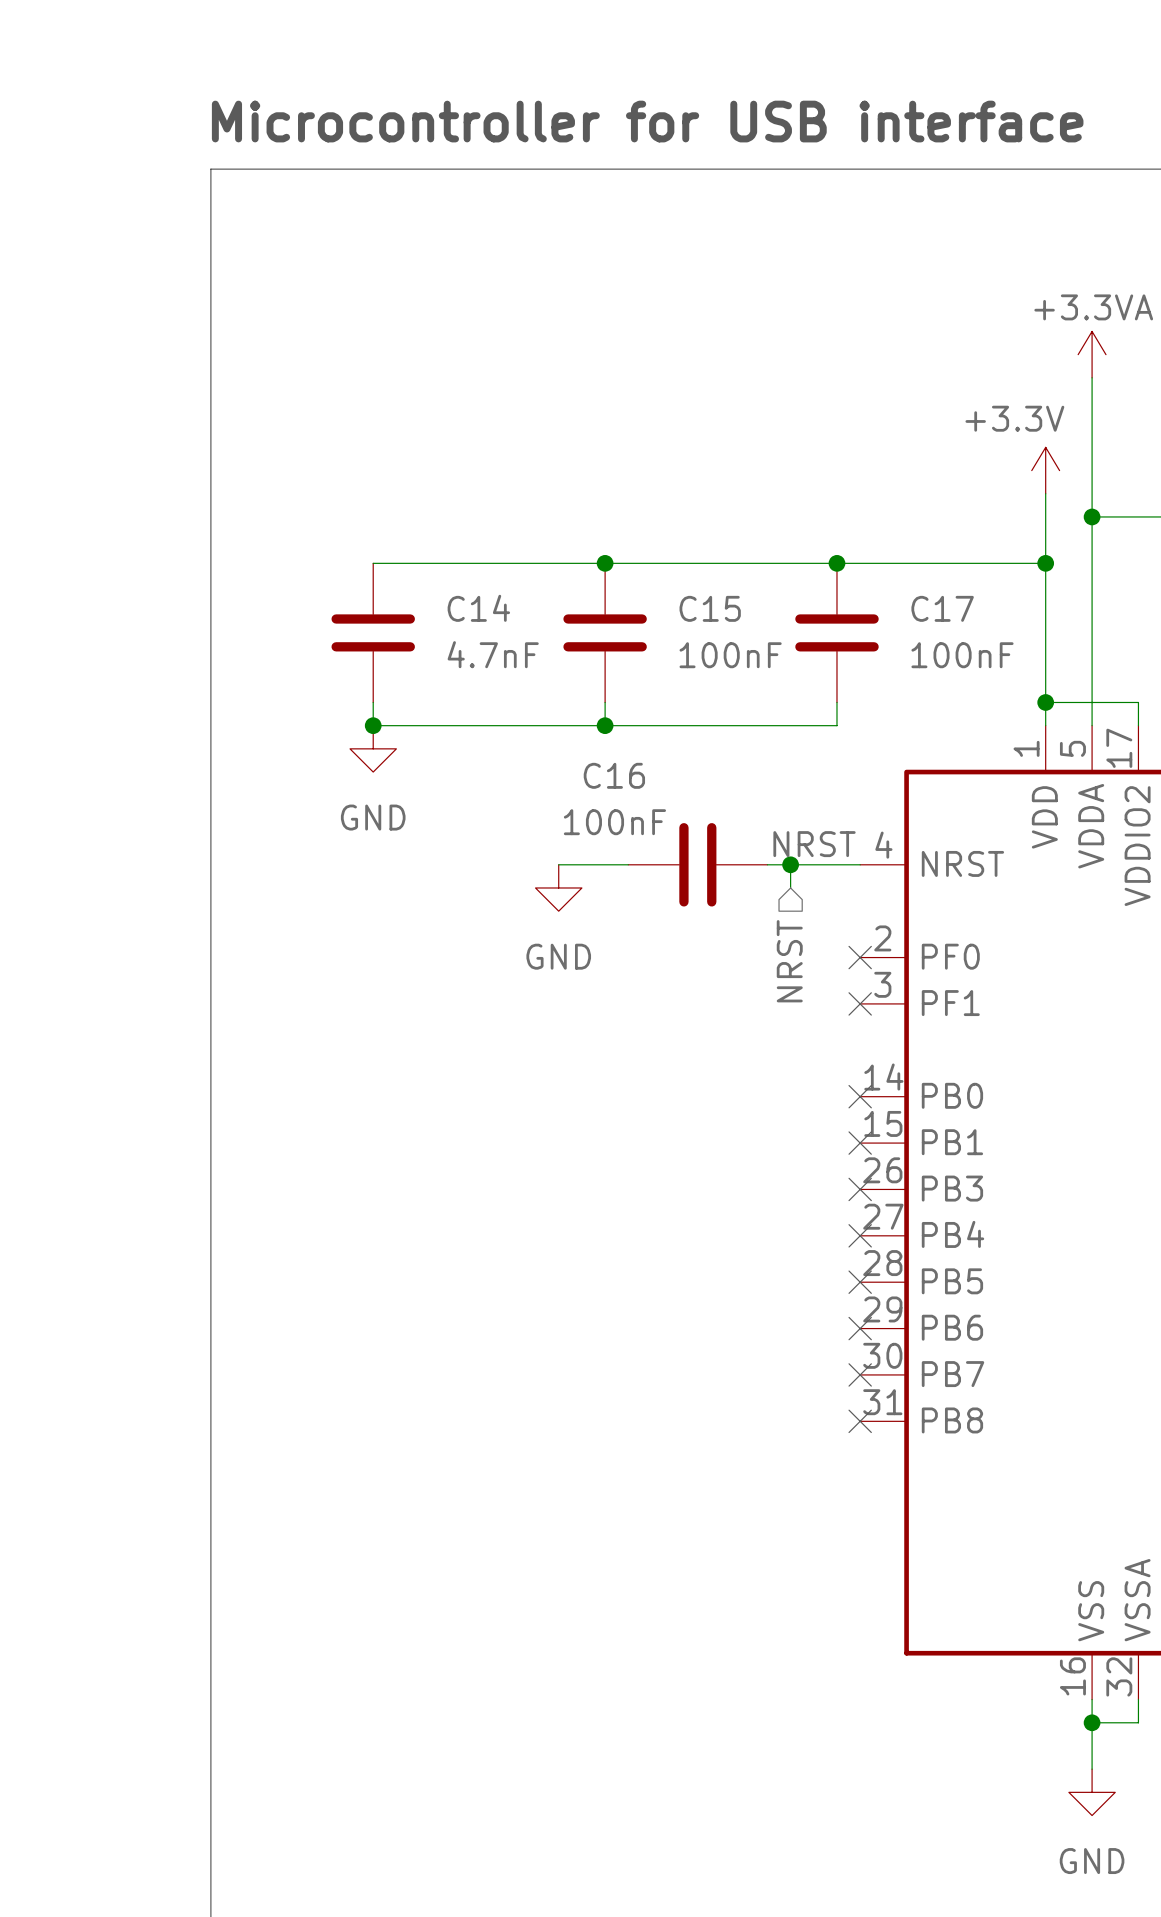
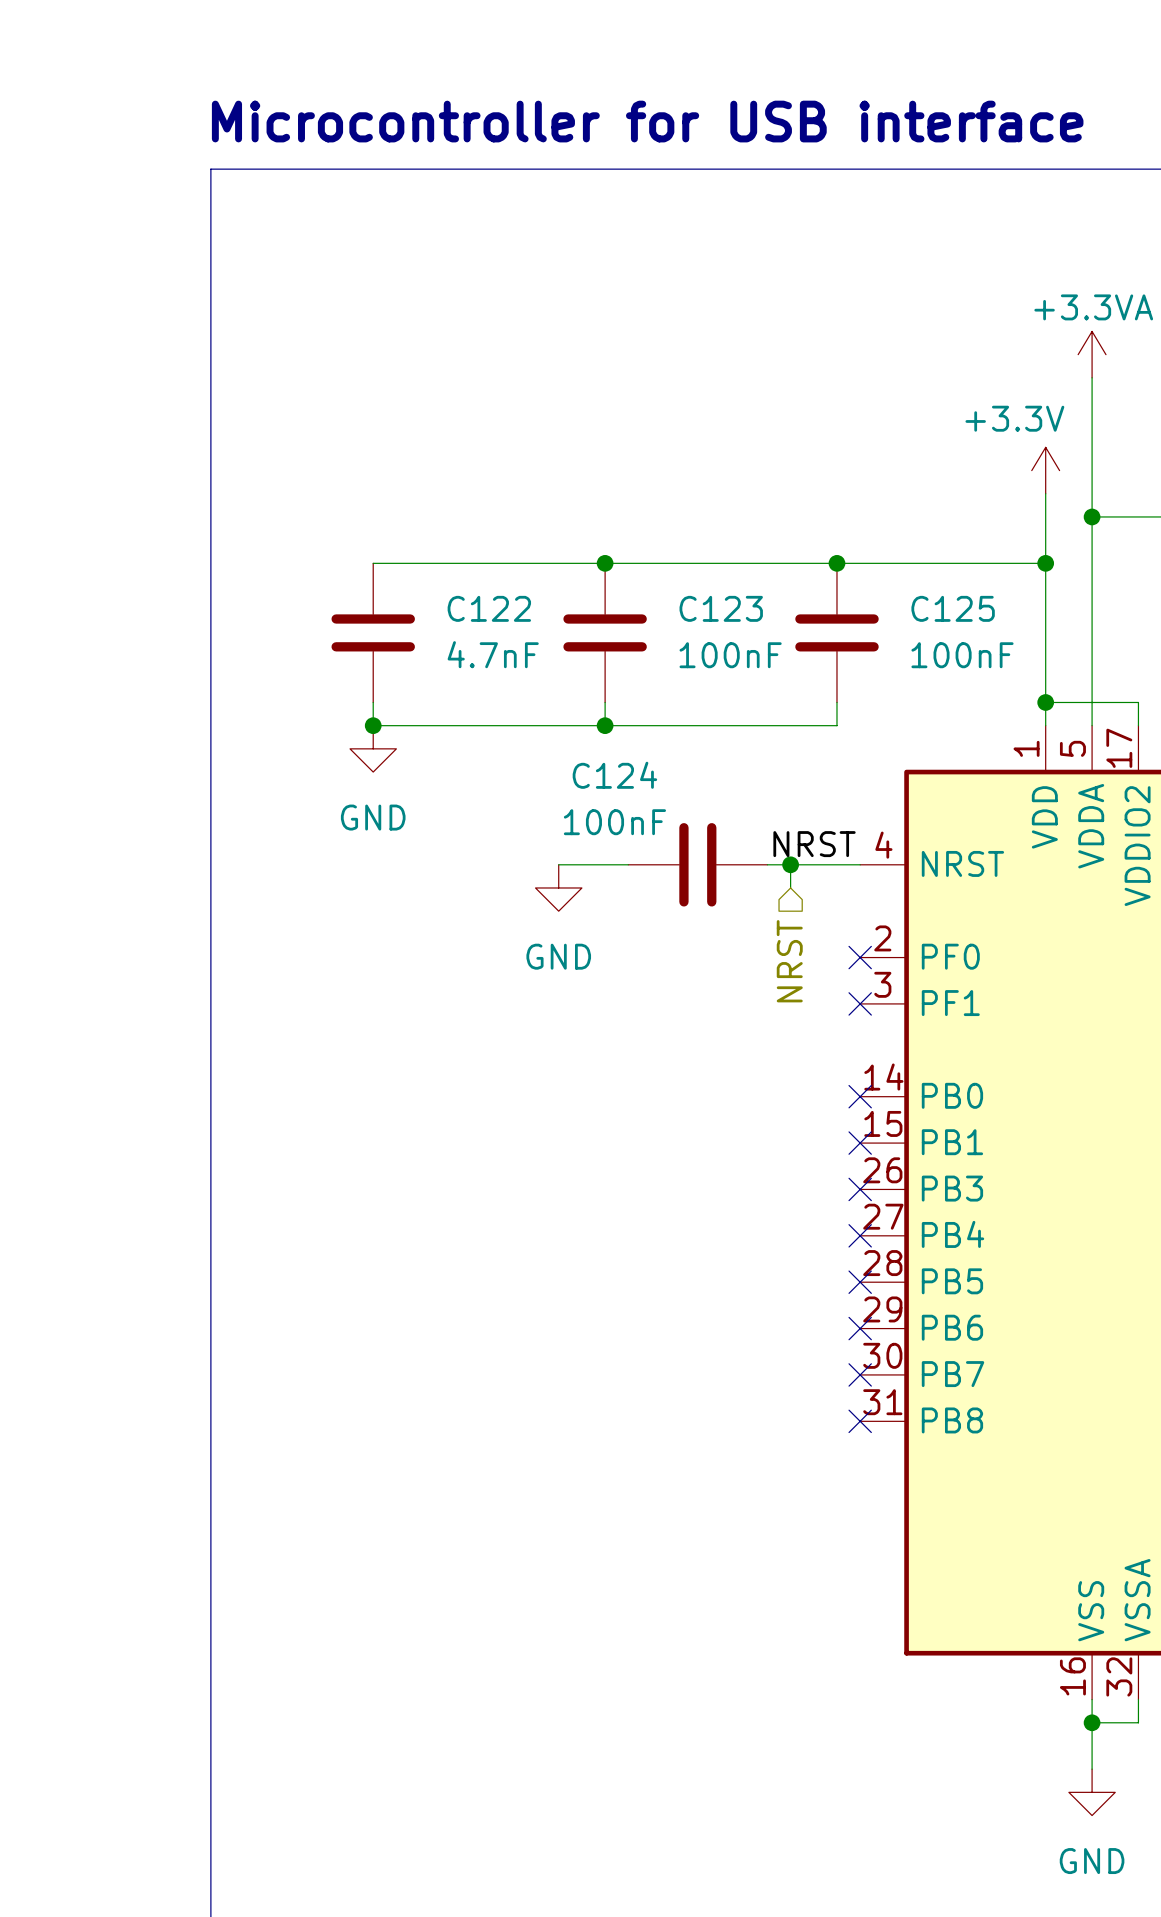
C14 name: C14 (478, 608) -> C122 (489, 608)
C15 name: C15 (710, 608) -> C123 (721, 608)
C17 name: C17 (942, 608) -> C125 (953, 608)
C16 name: C16 (614, 775) -> C124 (614, 775)

